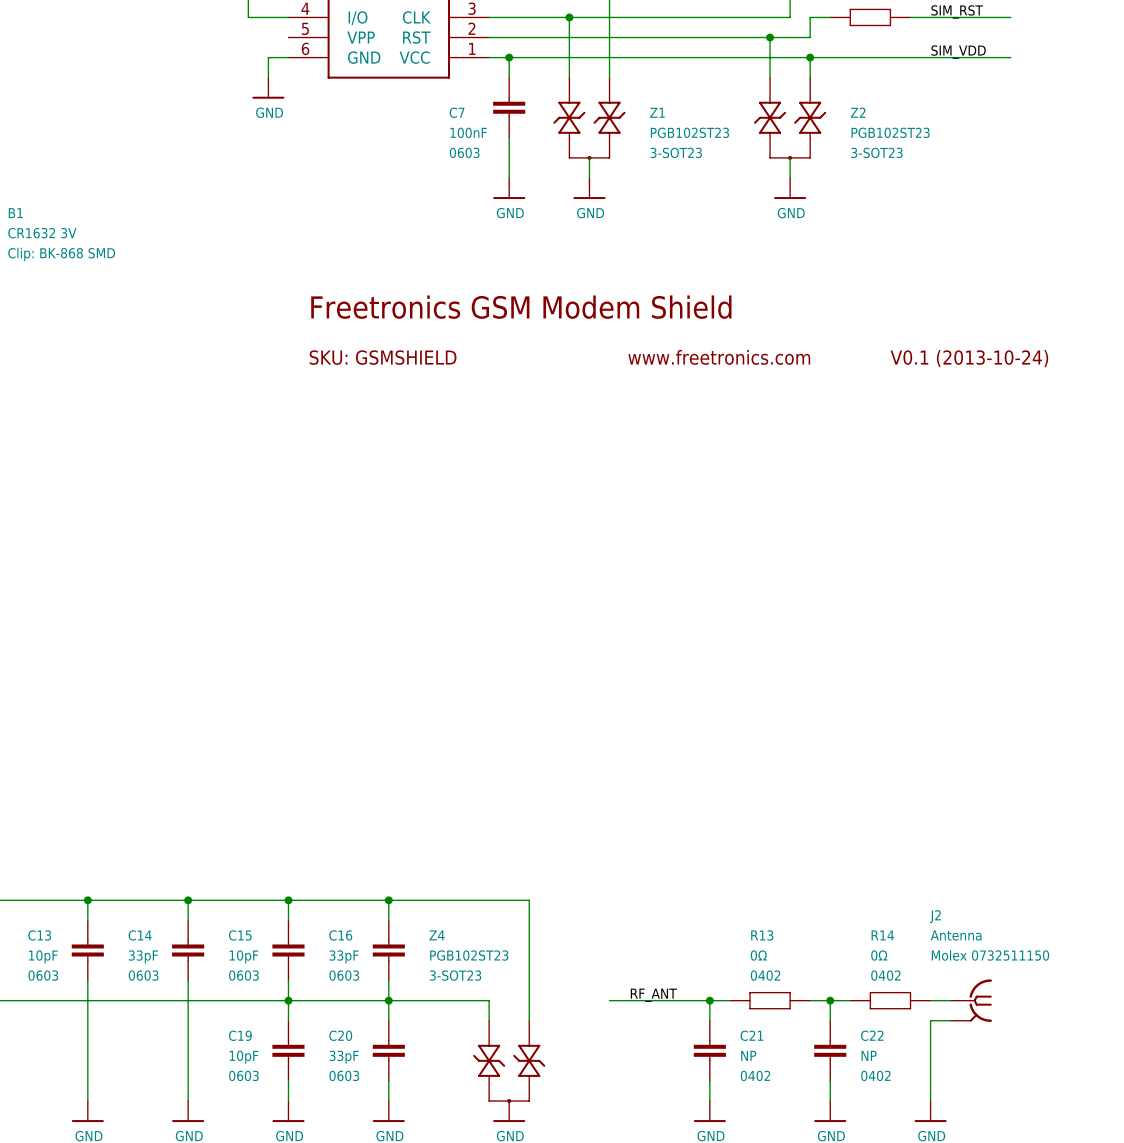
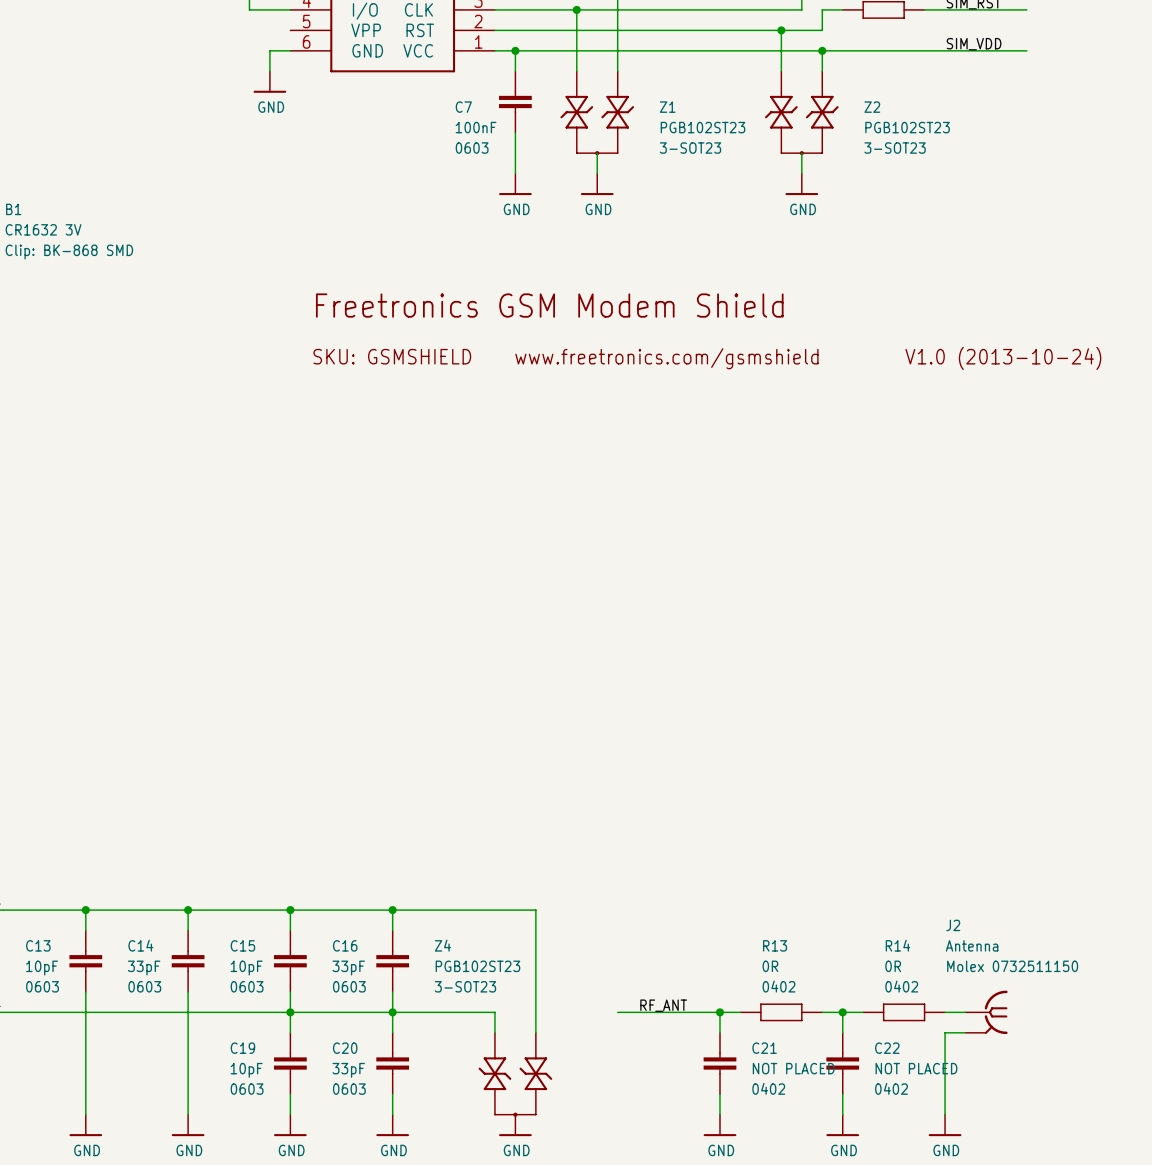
text: www.freetronics.com (719, 357) -> www.freetronics.com/gsmshield (666, 358)
text: V0.1 (2013-10-24) (969, 358) -> V1.0 (2013-10-24) (1003, 358)
R13 value: 0Ω (758, 955) -> 0R (770, 966)
R14 value: 0Ω (879, 955) -> 0R (893, 966)
C21 value: NP (748, 1055) -> NOT PLACED (793, 1068)
C22 value: NP (869, 1055) -> NOT PLACED (916, 1068)

